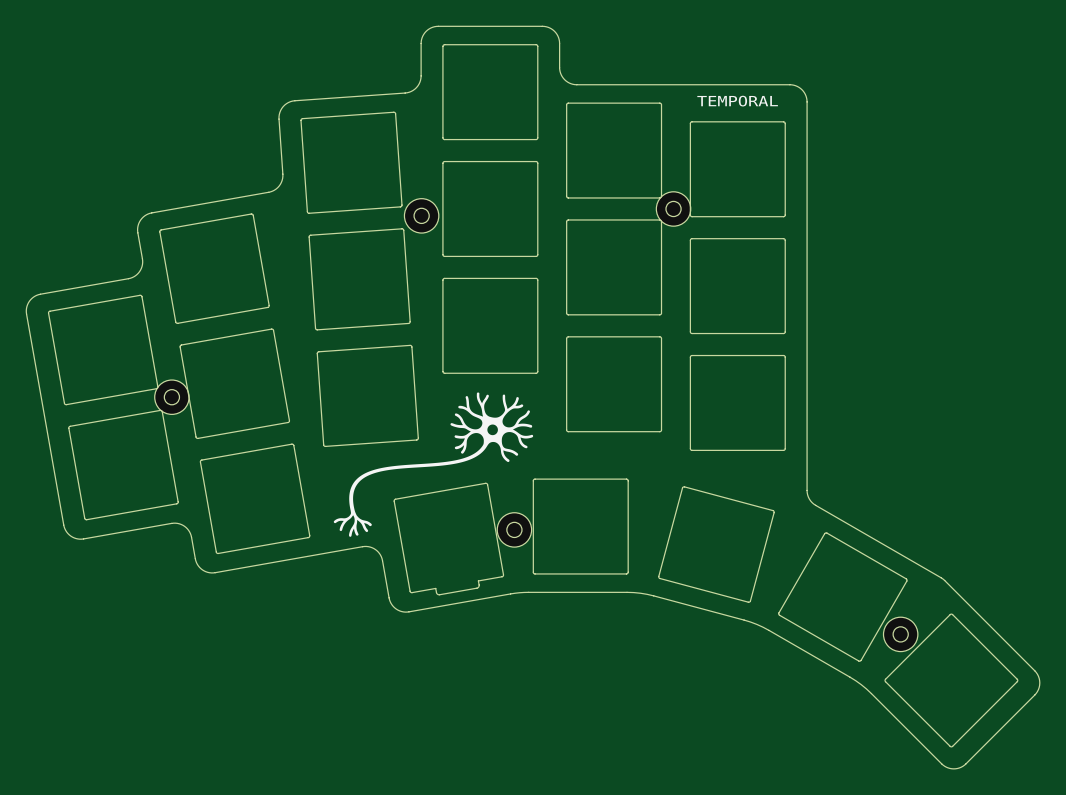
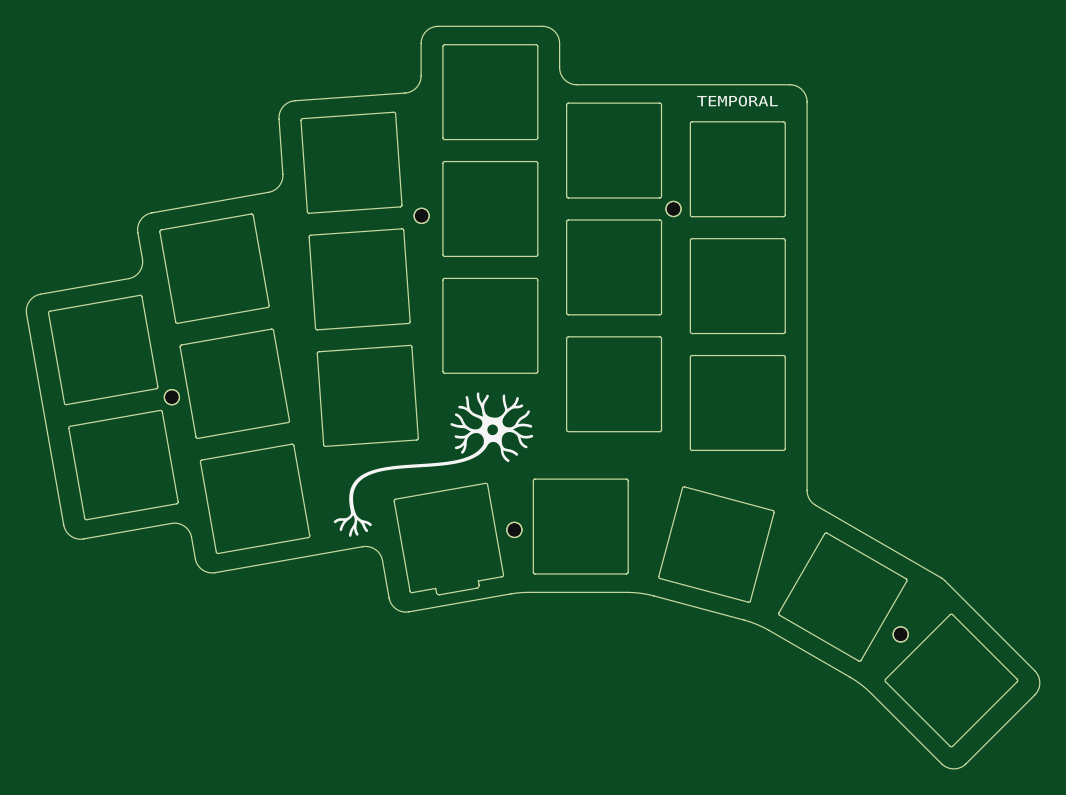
part footprint: [656, 191, 691, 227] -> [665, 201, 682, 217]
part footprint: [404, 198, 439, 234] -> [414, 208, 430, 224]
part footprint: [154, 380, 190, 415] -> [164, 389, 180, 405]
part footprint: [497, 512, 532, 548] -> [506, 522, 522, 538]
part footprint: [883, 617, 918, 652] -> [893, 626, 909, 642]

